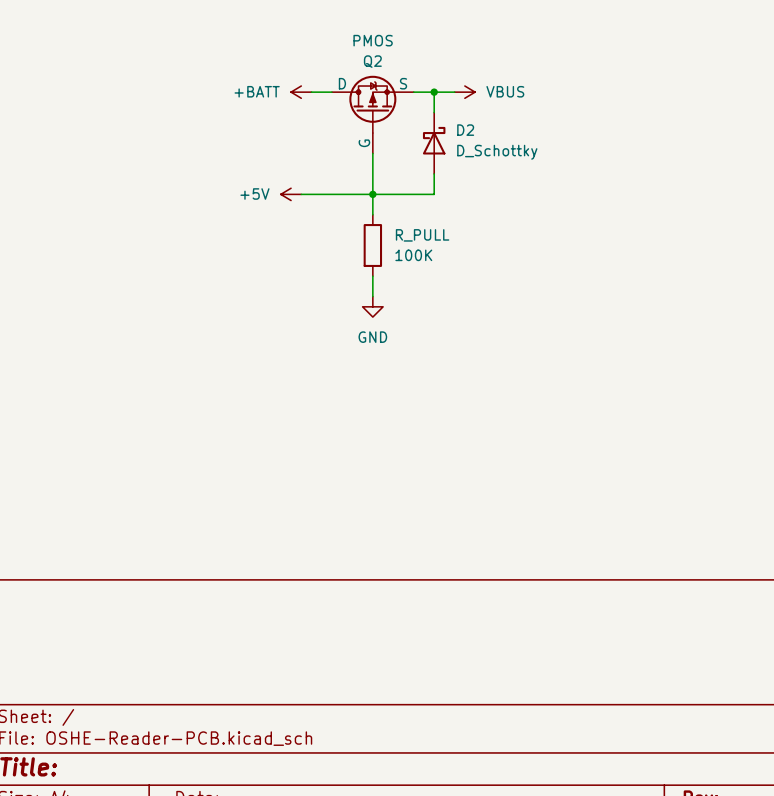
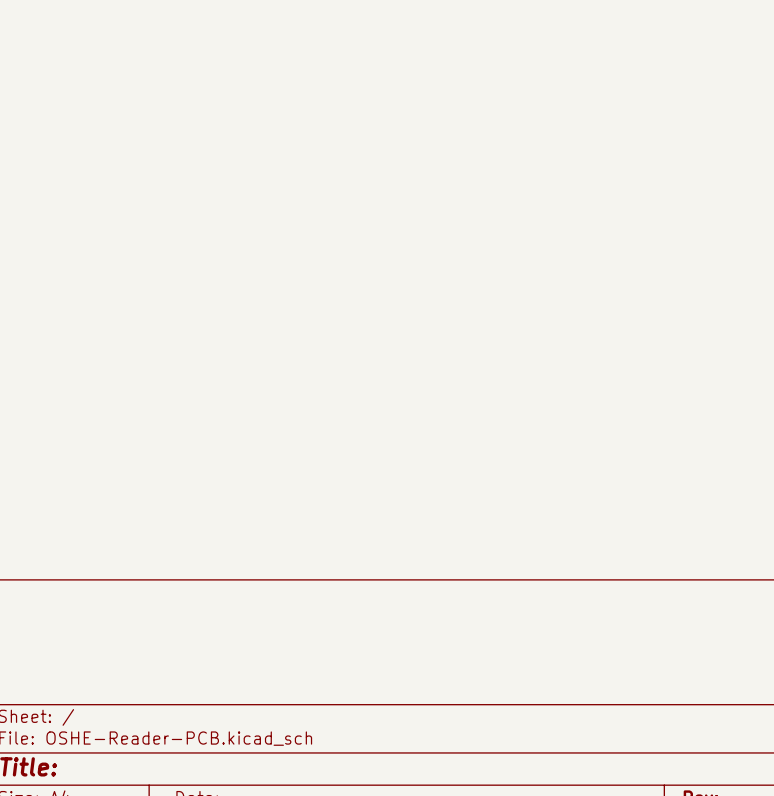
power symbol: +BATT (301, 92) -> none
wire: (311, 92) (331, 92) -> none
wire: (413, 92) (454, 92) -> none
wire: (434, 92) (434, 112) -> none
junction: (434, 92) -> none
power symbol: VBUS (464, 92) -> none
Q2: PMOS (372, 114) -> none
D2: D_Schottky (434, 143) -> none
wire: (372, 153) (372, 214) -> none
wire: (434, 173) (434, 194) (301, 194) -> none
power symbol: +5V (291, 194) -> none
junction: (372, 194) -> none
R_PULL: 100K (372, 245) -> none
wire: (372, 276) (372, 296) -> none
power symbol: GND (372, 306) -> none

